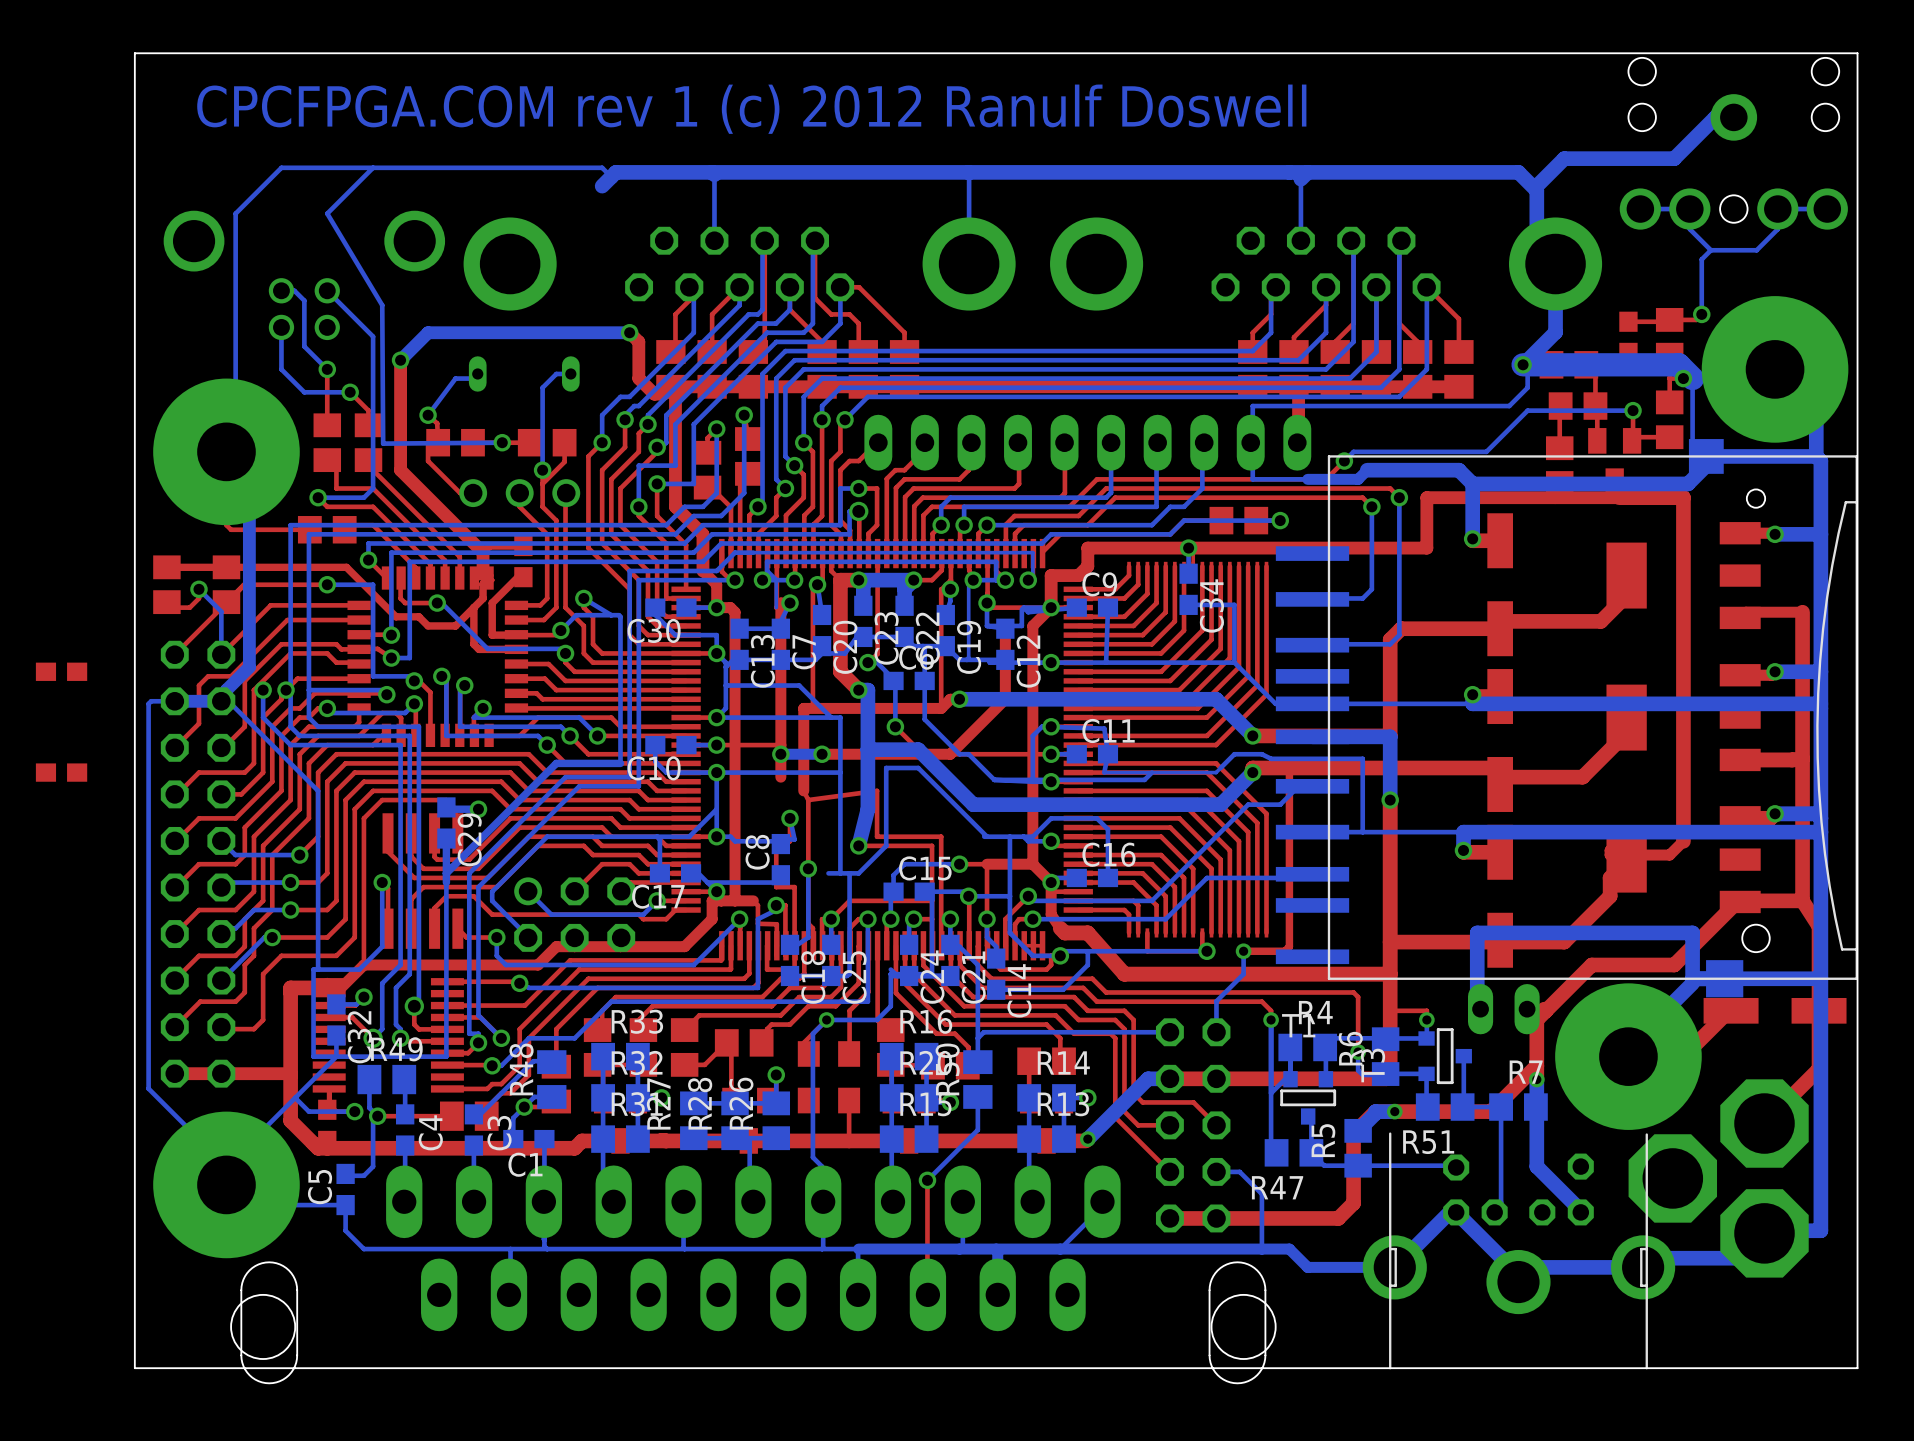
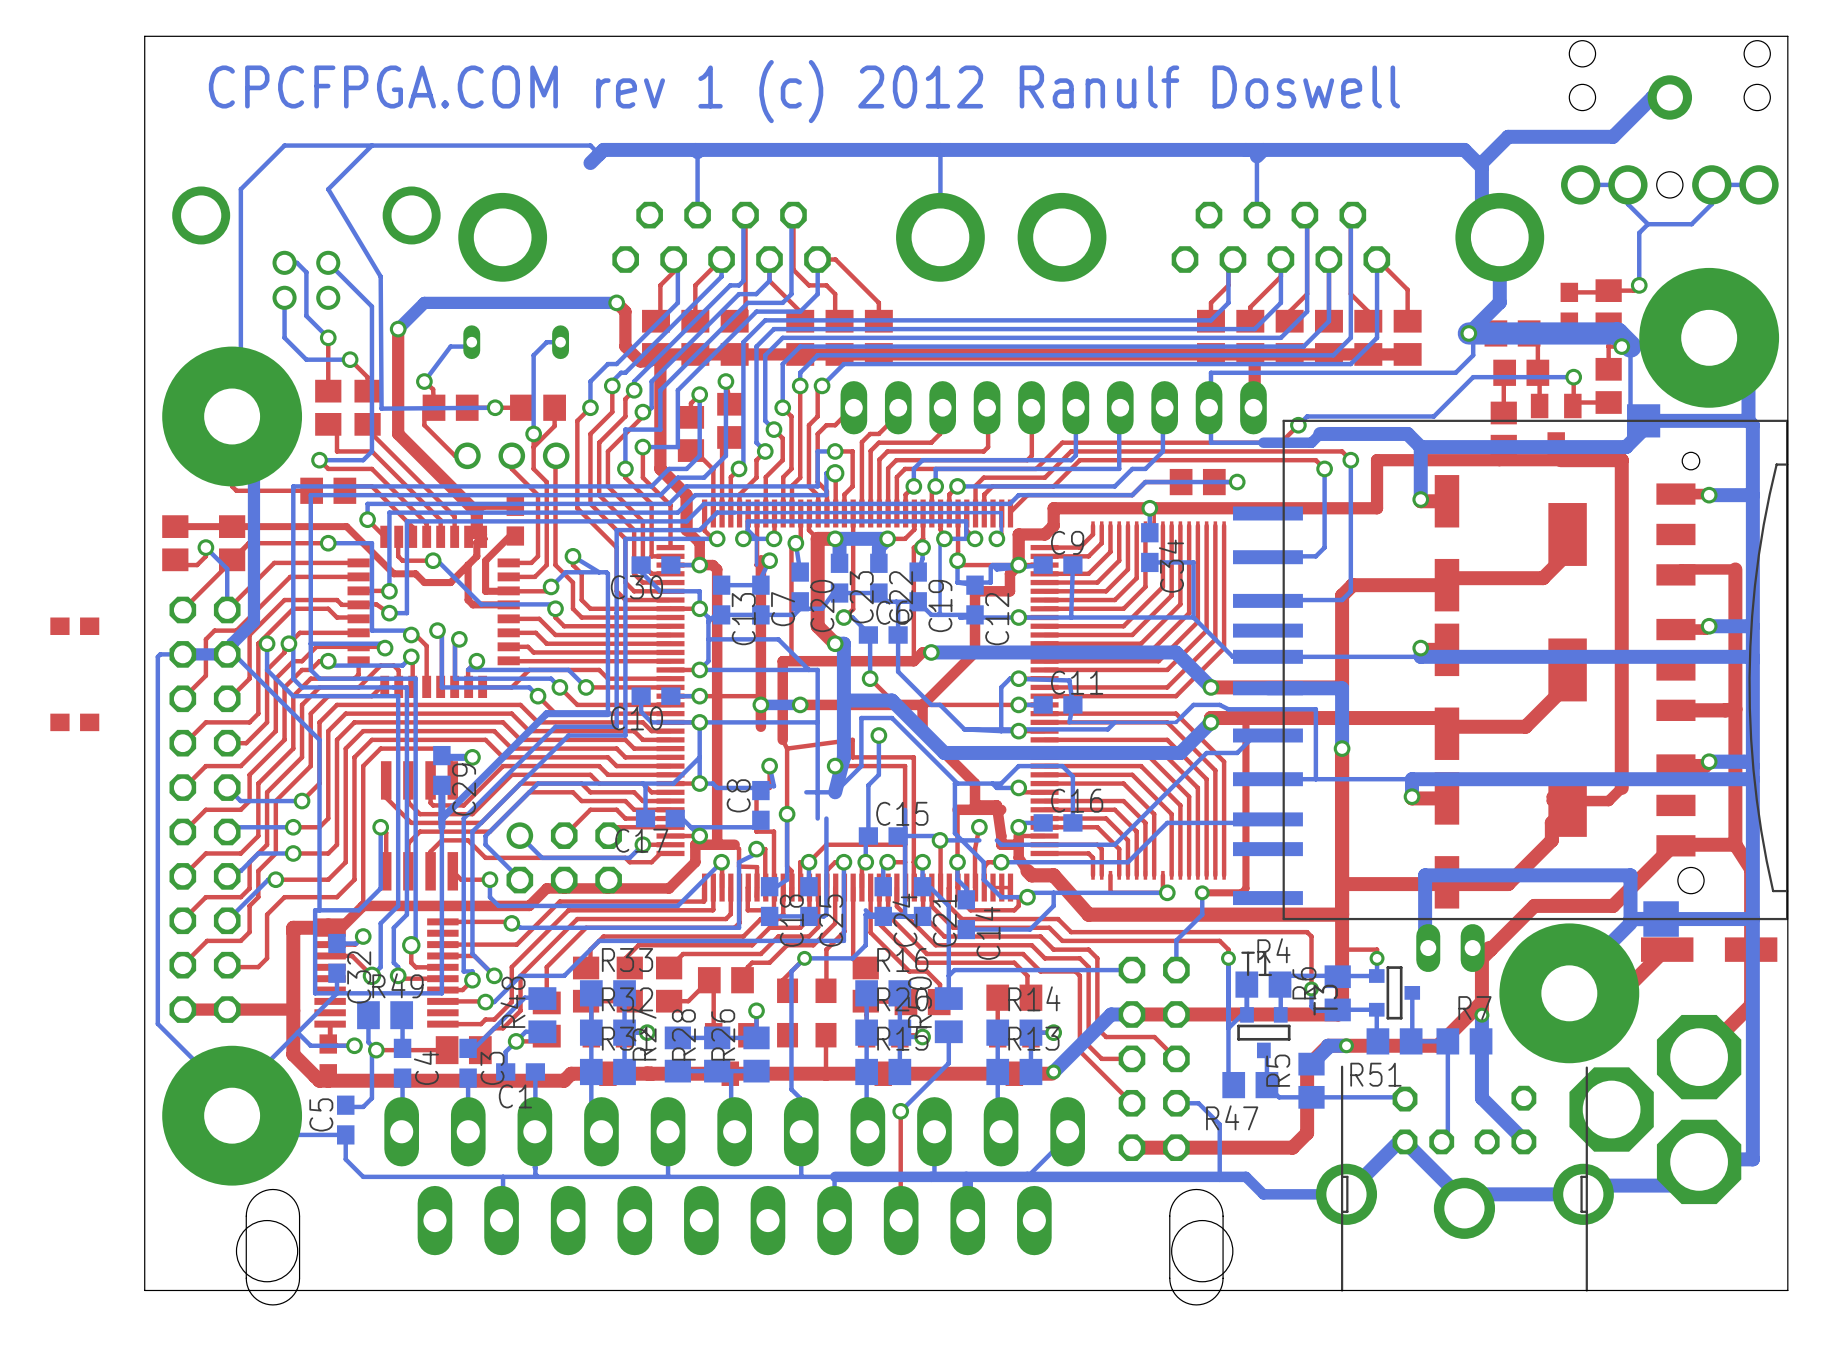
top track: (1042, 616) (1032, 625) (1032, 864) (1051, 882) (1051, 891) -> (1009, 573) (1009, 591) (975, 591)
top track: none -> (922, 704) (922, 731) (975, 783) (975, 805) (996, 805) (1001, 844) (1018, 844)
via: none -> (878, 735)
top track: (877, 809) (877, 836) (941, 836) -> (852, 757) (913, 757) (913, 783)
bottom track: (886, 818) (886, 845) (858, 873) (828, 873) -> (861, 766) (835, 792) (806, 792)
bottom track: (1009, 836) (1009, 932) (1014, 937) -> (954, 783) (954, 833) (983, 862) (983, 879)
via position: (858, 845) -> (835, 766)
top track: (932, 845) (858, 845) -> (905, 792) (905, 766) (835, 766)
bottom track: none -> (905, 809) (905, 836)
bottom track: (959, 864) (904, 864) (893, 875) -> (878, 735) (878, 774) (868, 785) (868, 820)
via: (959, 864) -> none
top track: (987, 864) (959, 864) -> none
top track: (1028, 896) (1005, 919) -> (979, 827) (975, 849) (975, 862)
via position: (1028, 896) -> (979, 827)

